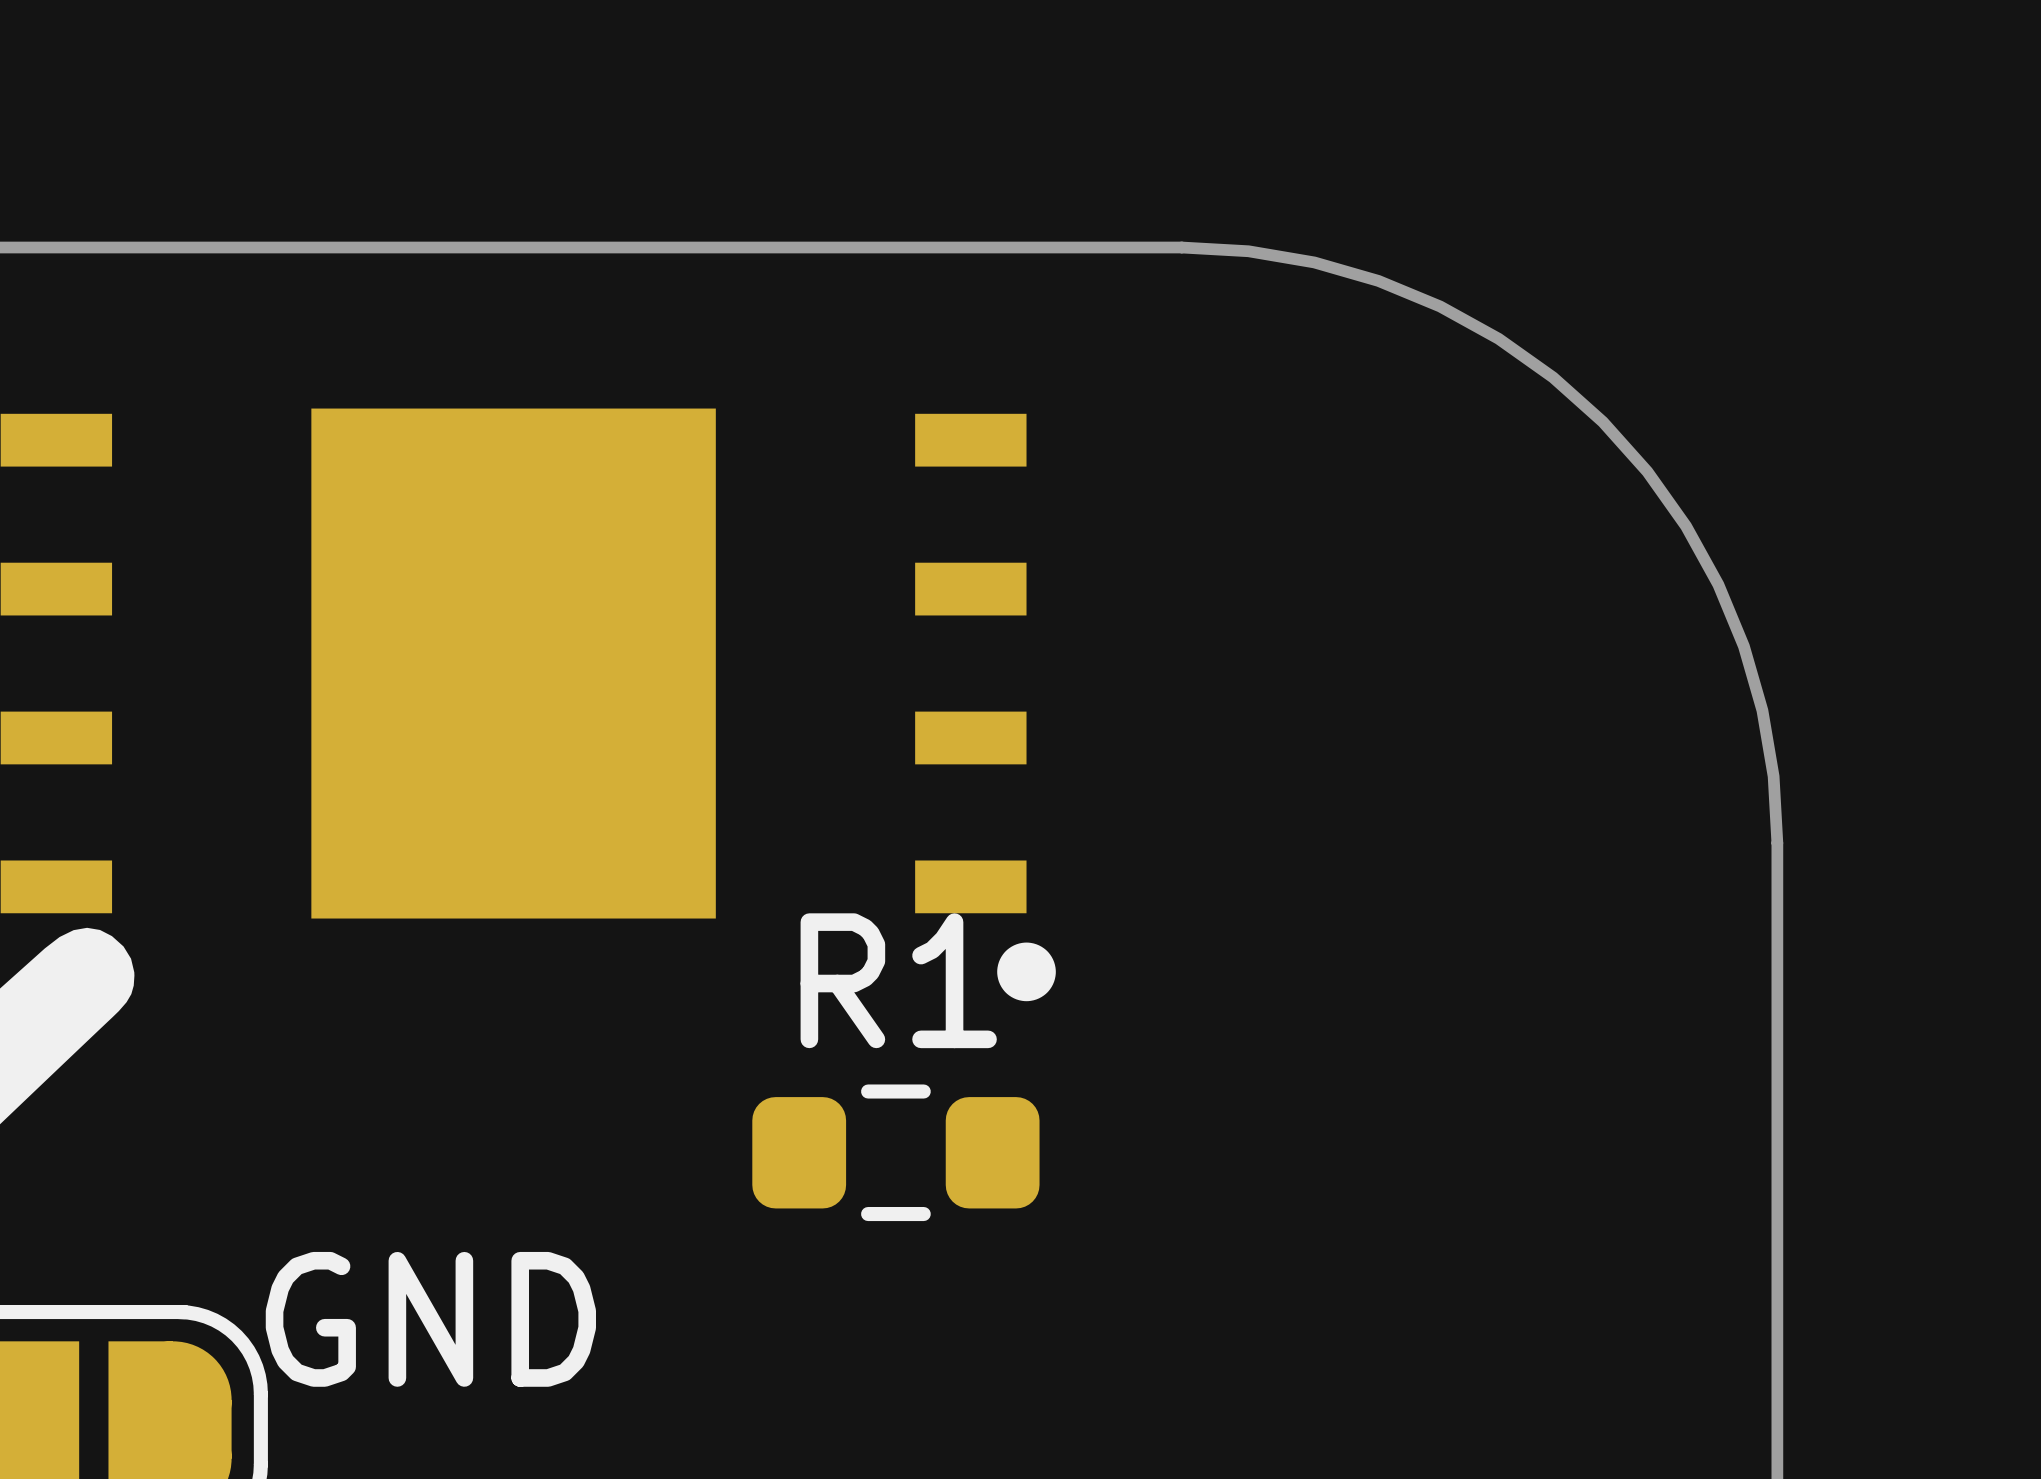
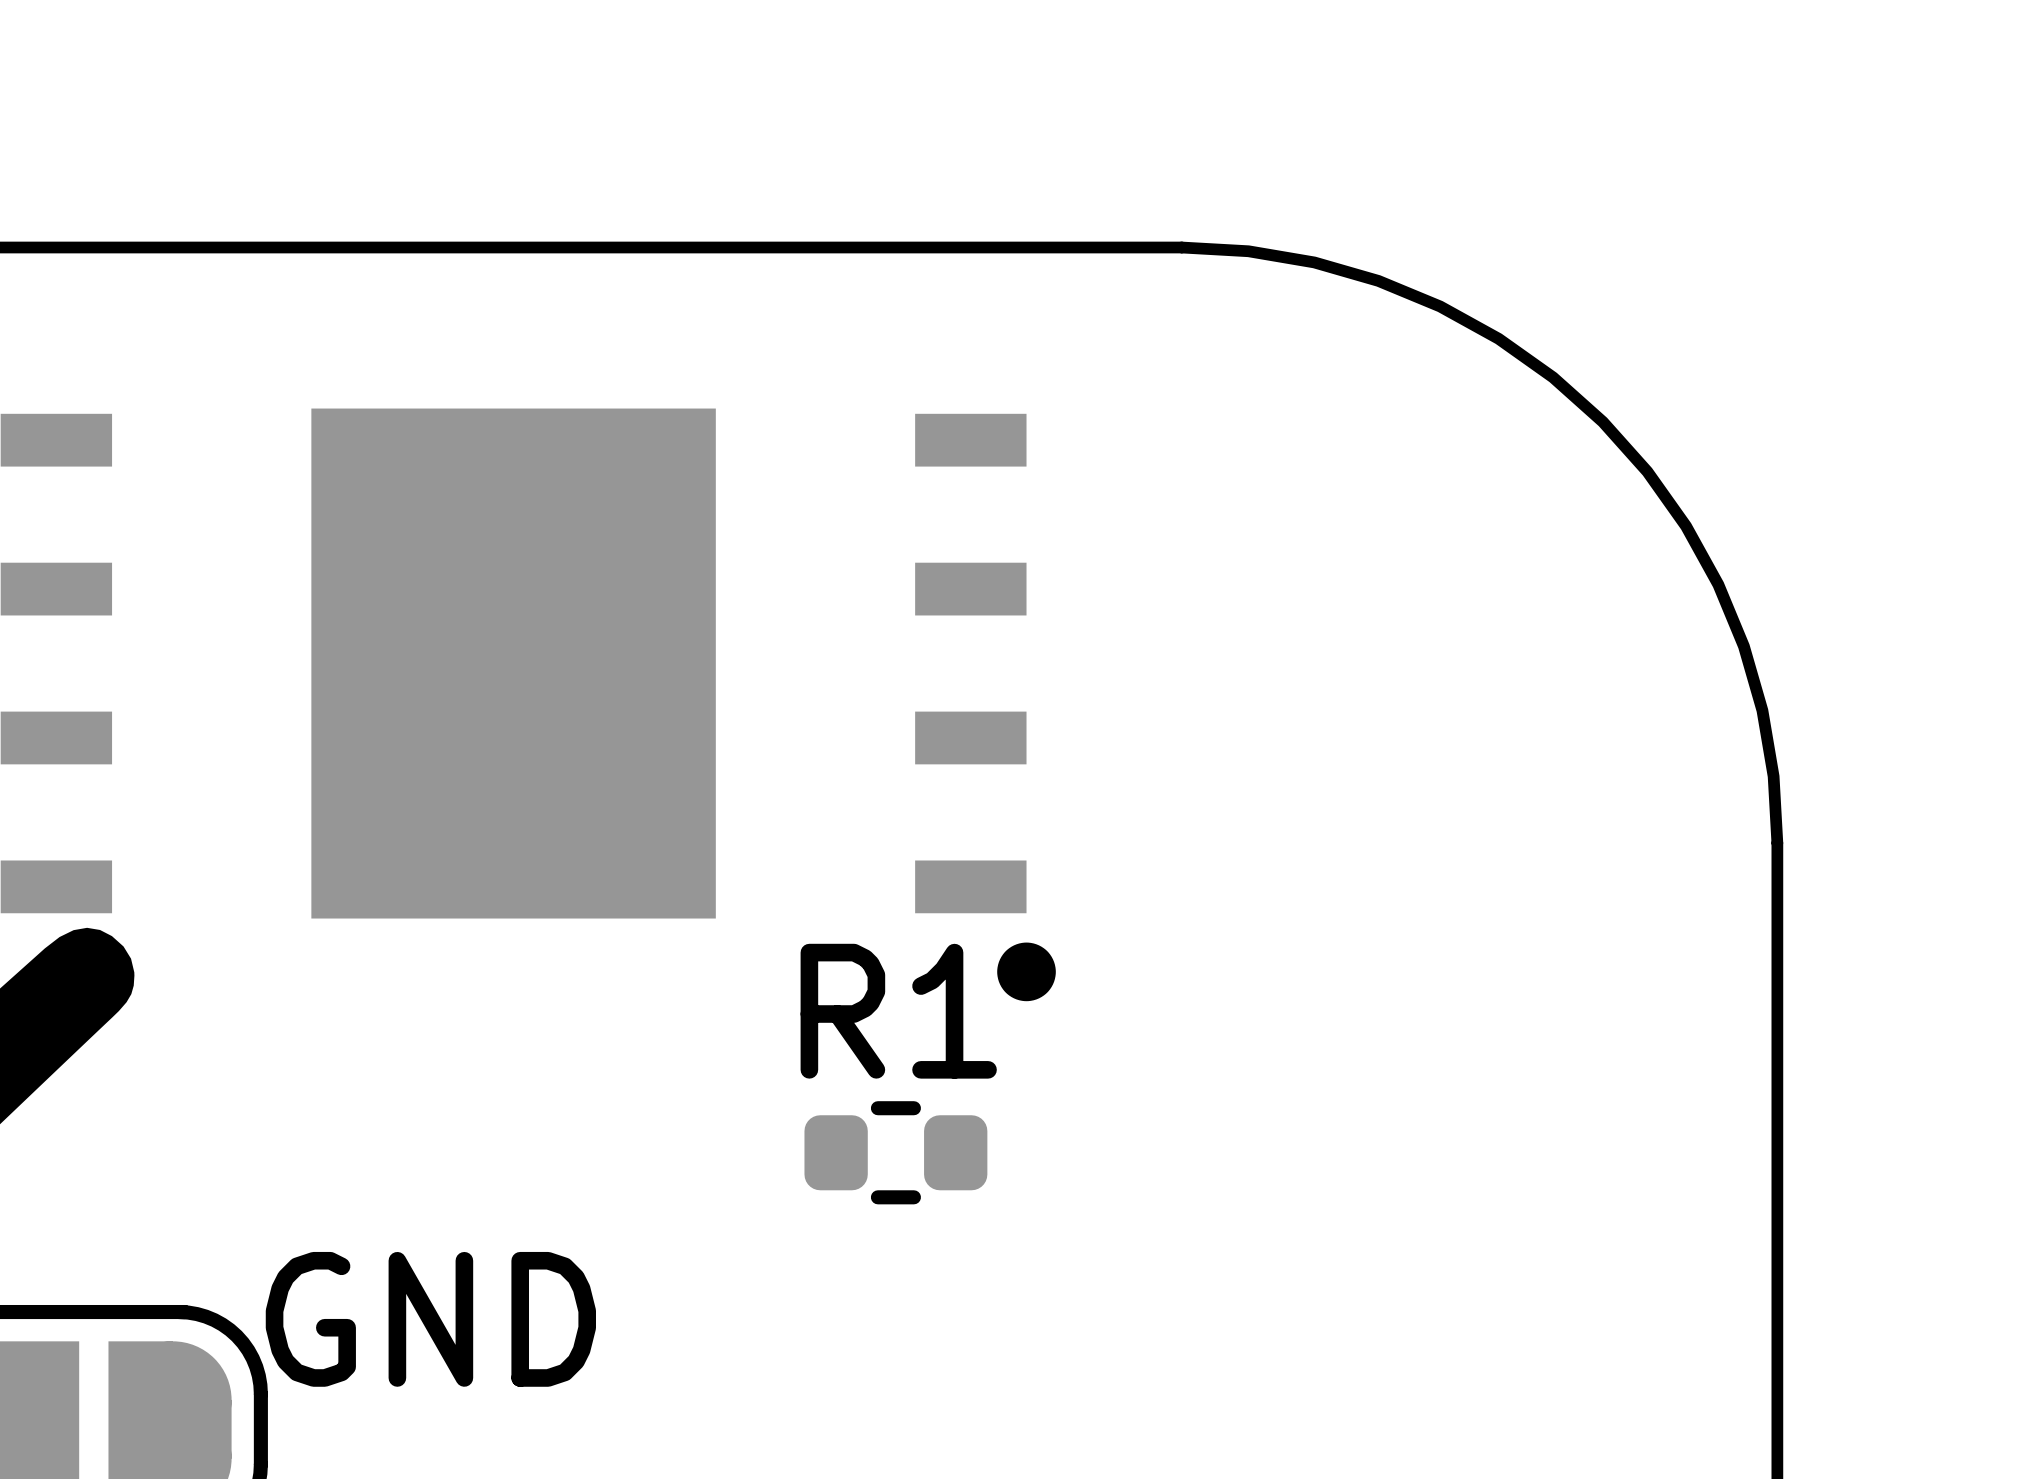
R1 name position: R1 (898, 980) -> R1 (898, 1011)
R1 footprint: [752, 1084, 1040, 1222] -> [804, 1101, 988, 1205]

